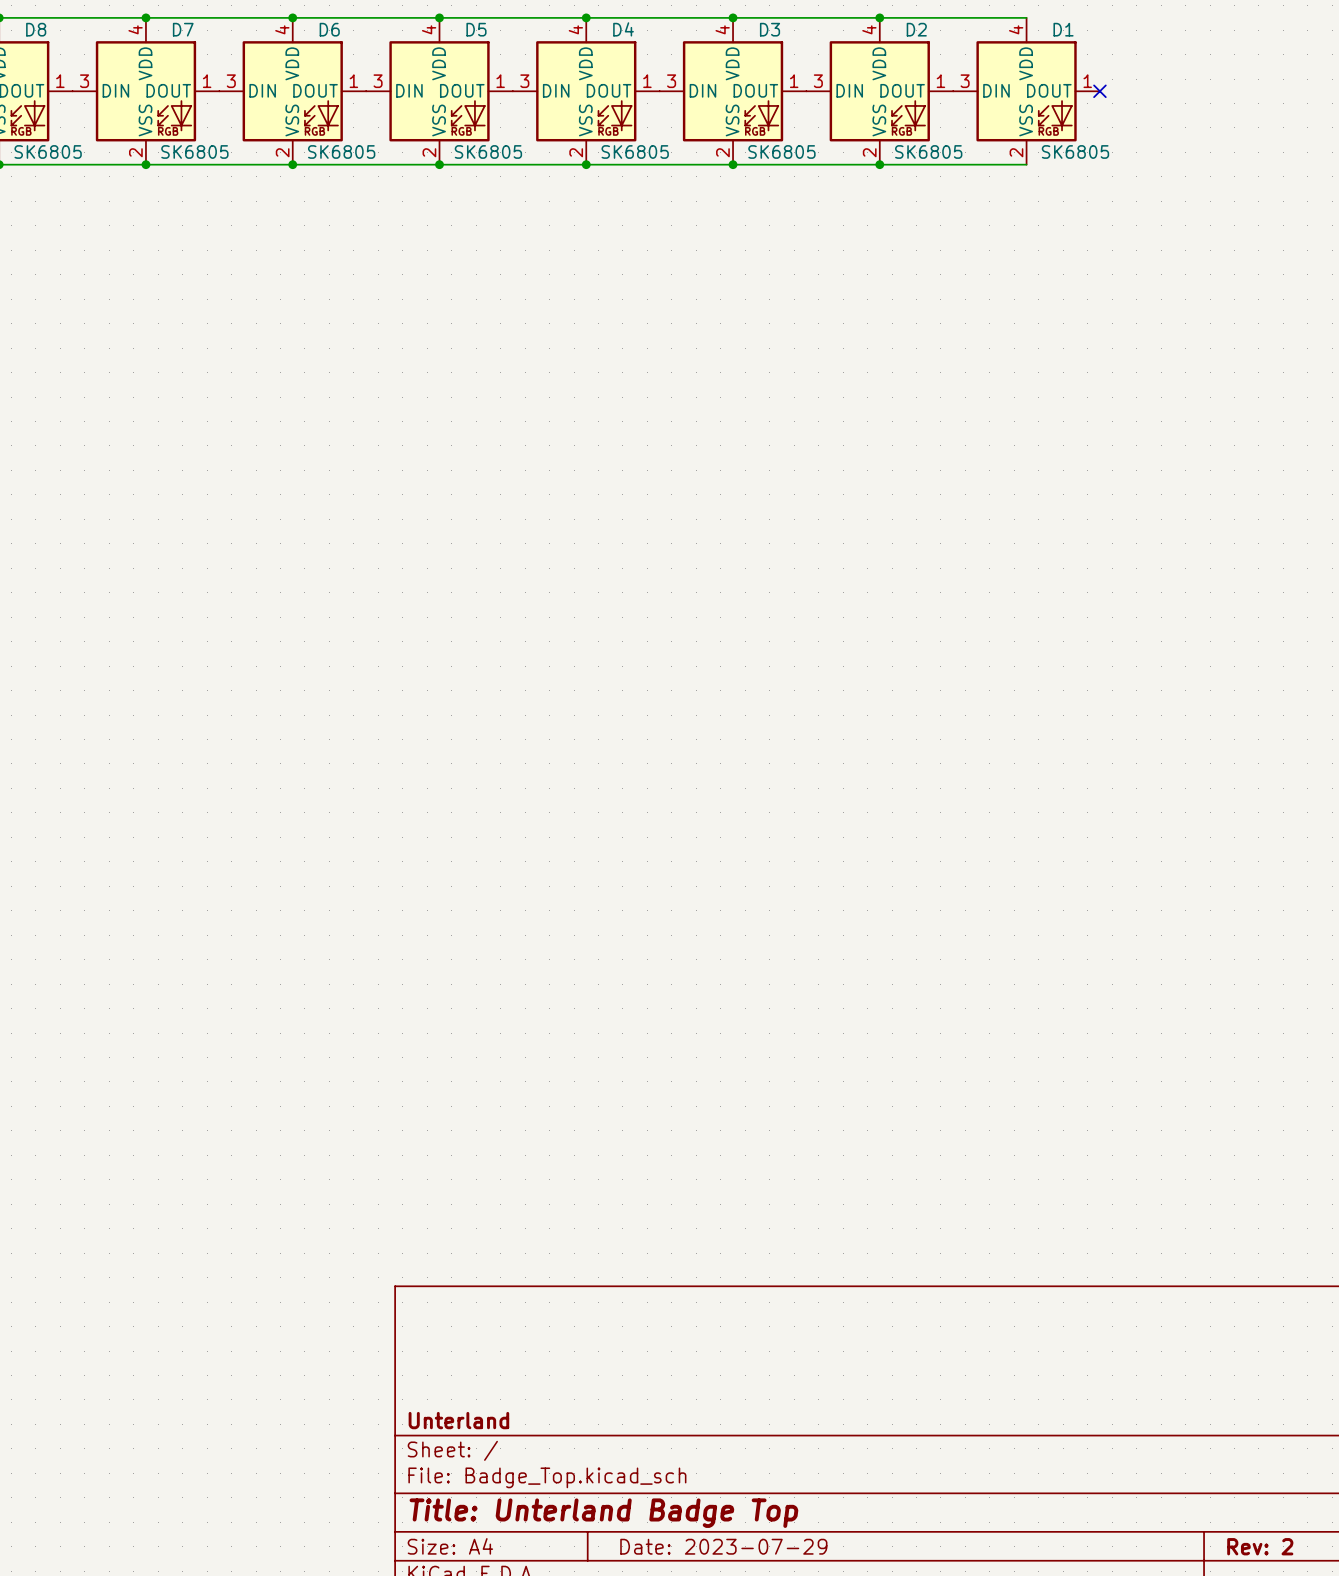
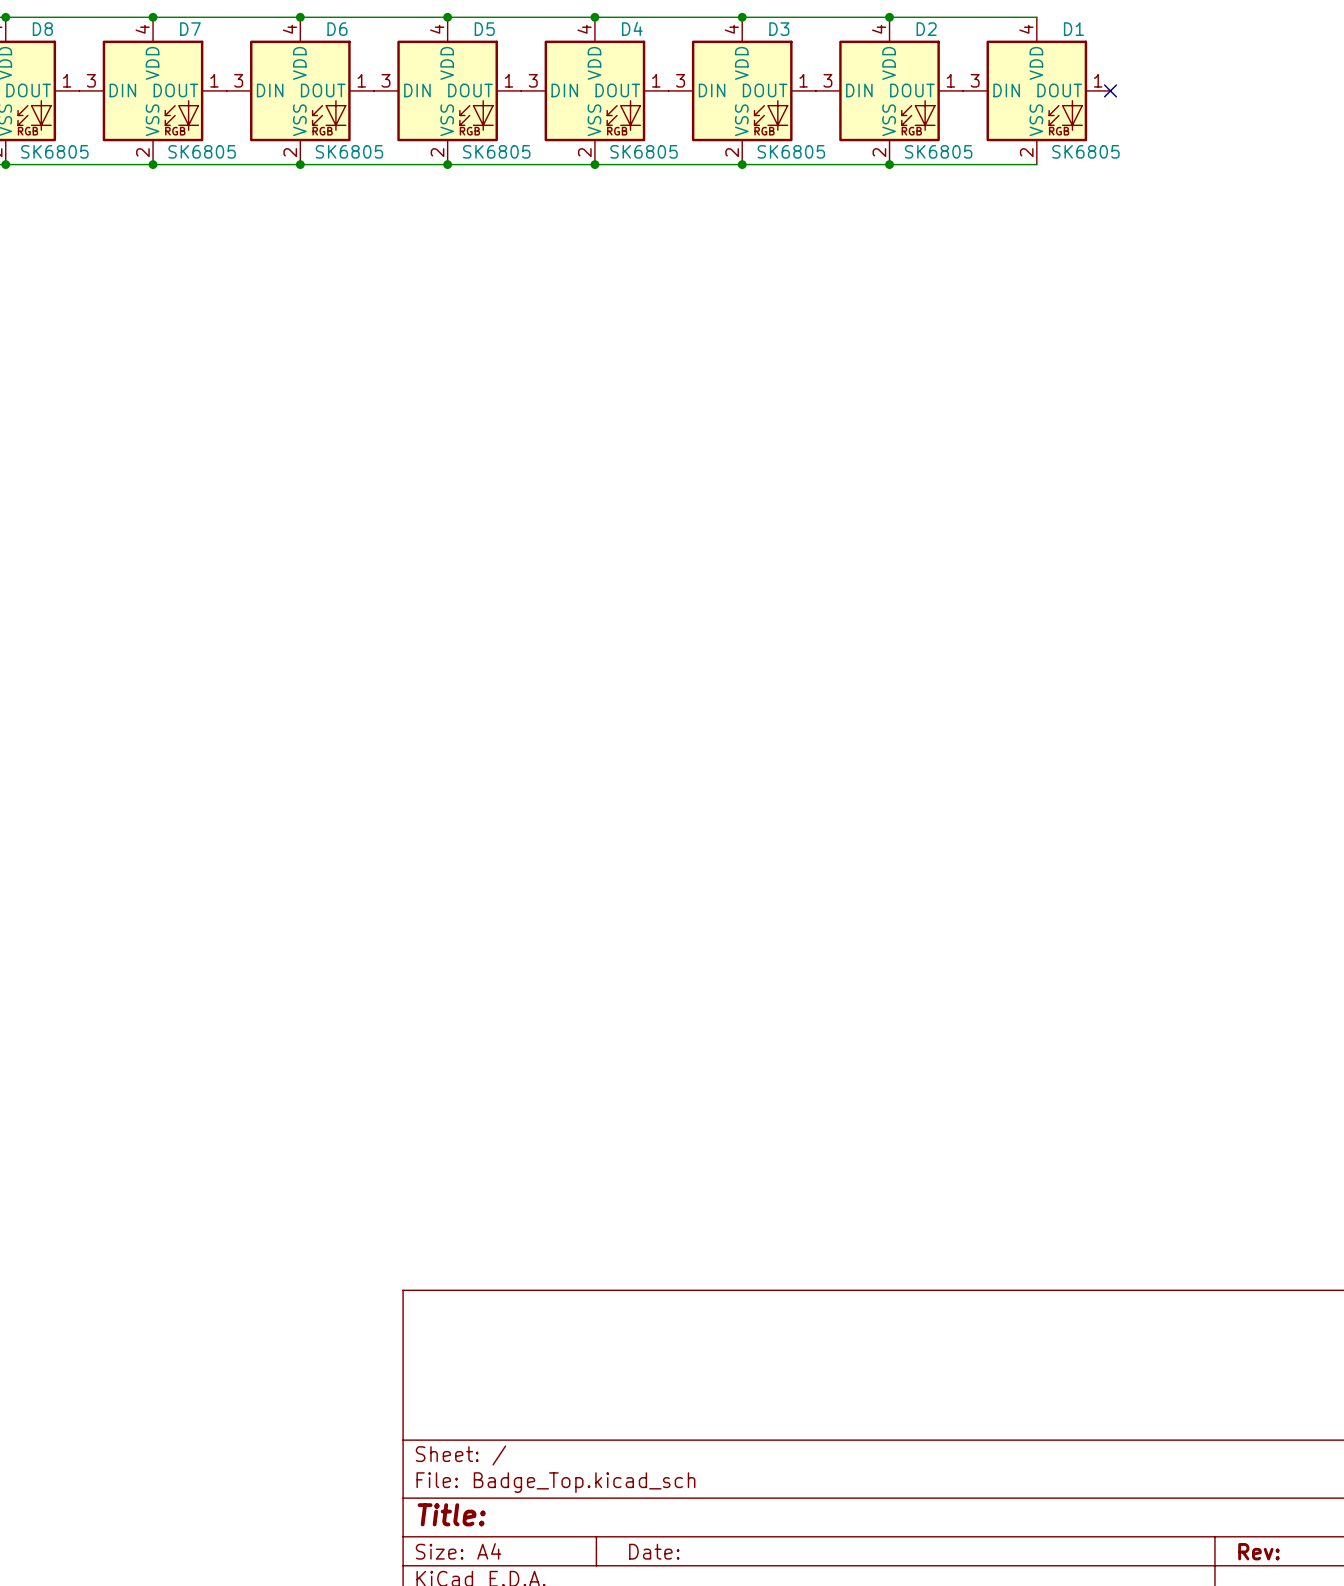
title block: Unterland (458, 1420) -> none
title block: Title: Unterland Badge Top (603, 1513) -> Title: (451, 1514)
title block: Date: 2023-07-29 (723, 1546) -> Date: (654, 1551)
title block: Rev: 2 (1260, 1546) -> Rev: (1258, 1551)

